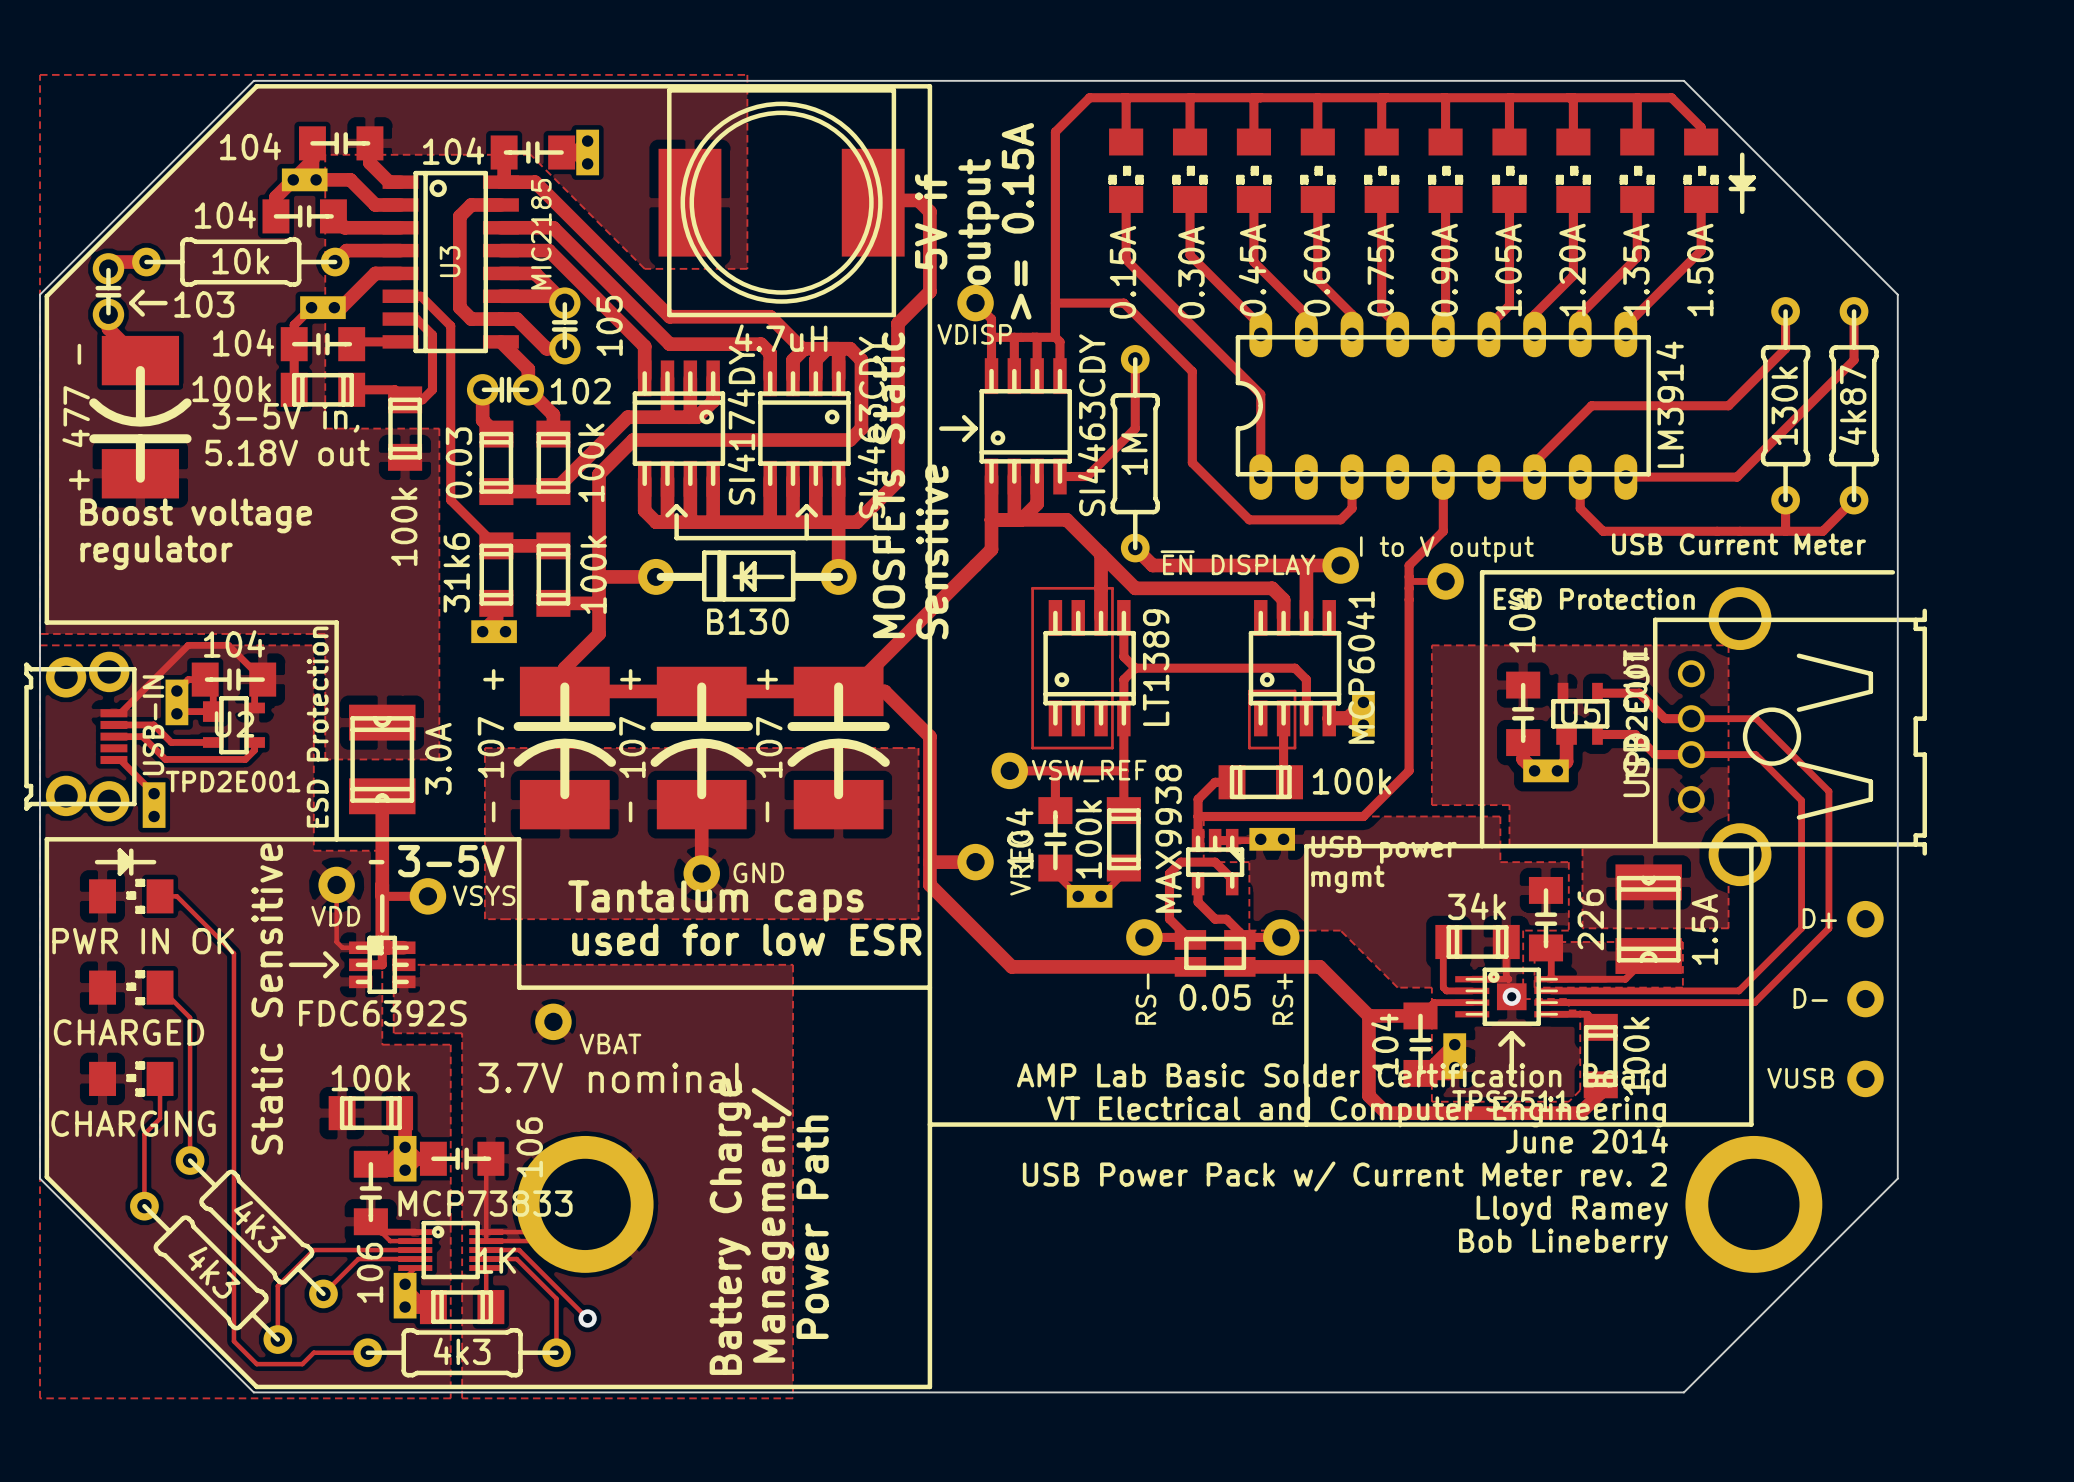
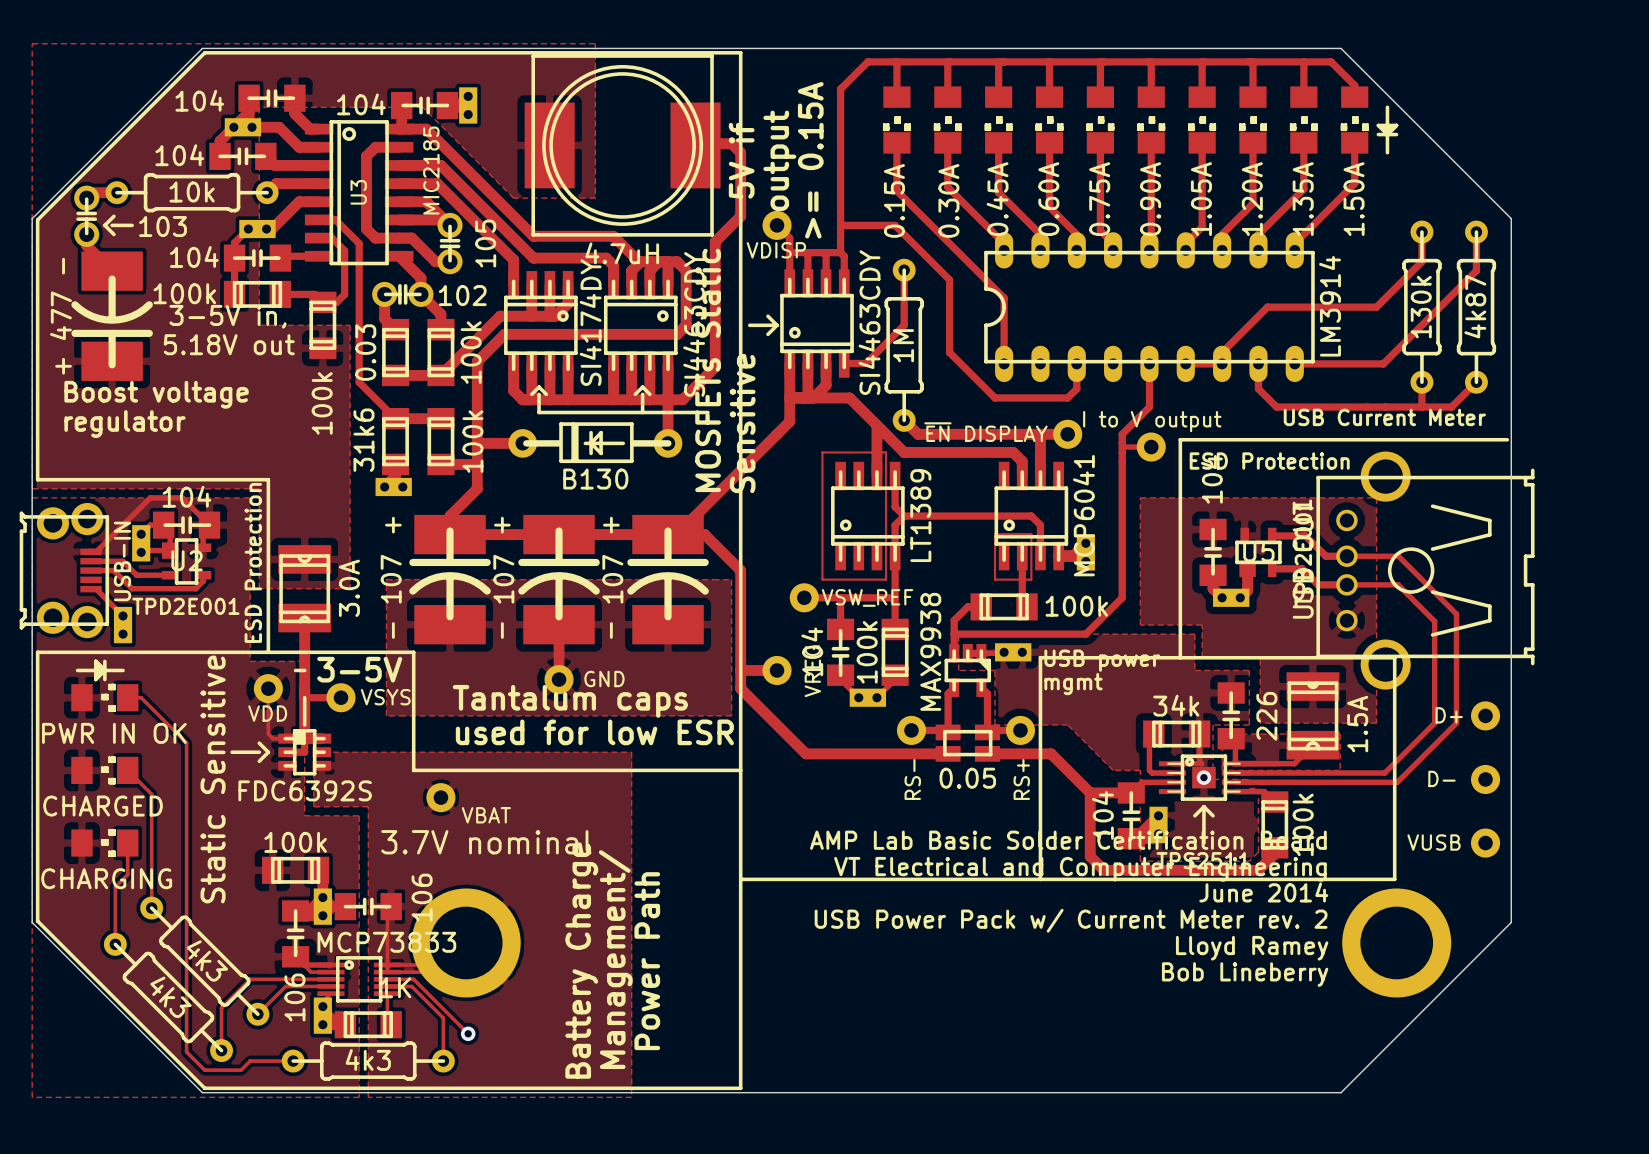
track: (1198, 883) (1198, 902) (1215, 919) (1226, 919) (1239, 932) -> (981, 687) (987, 693) (987, 726)
track: none -> (954, 687) (948, 693) (948, 732)
track: (1232, 883) (1232, 879) (1215, 862) (1180, 862) (1169, 873) (1169, 919) (1187, 937) -> none

